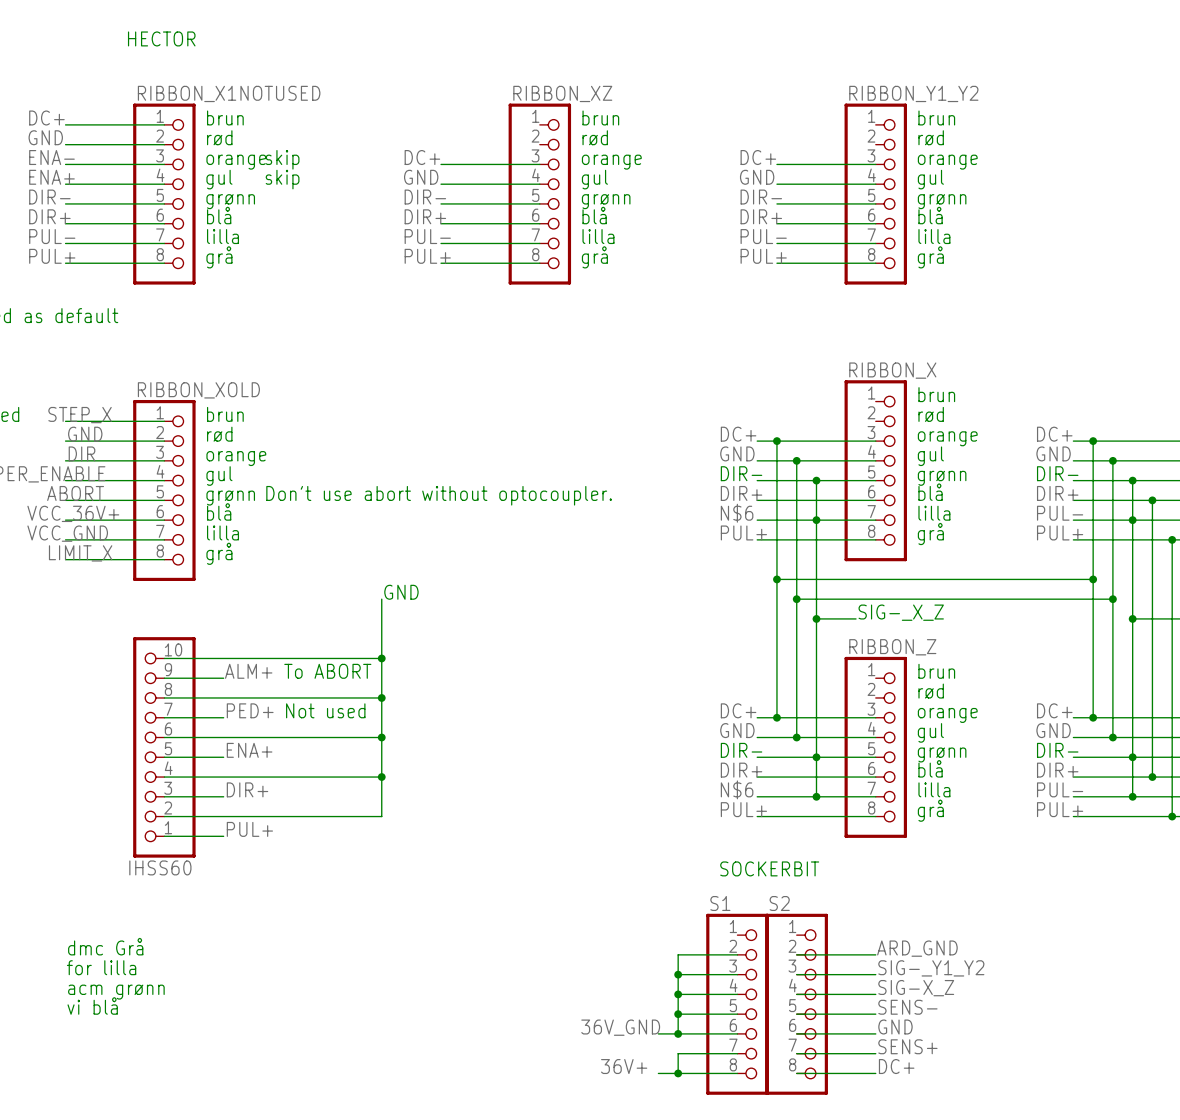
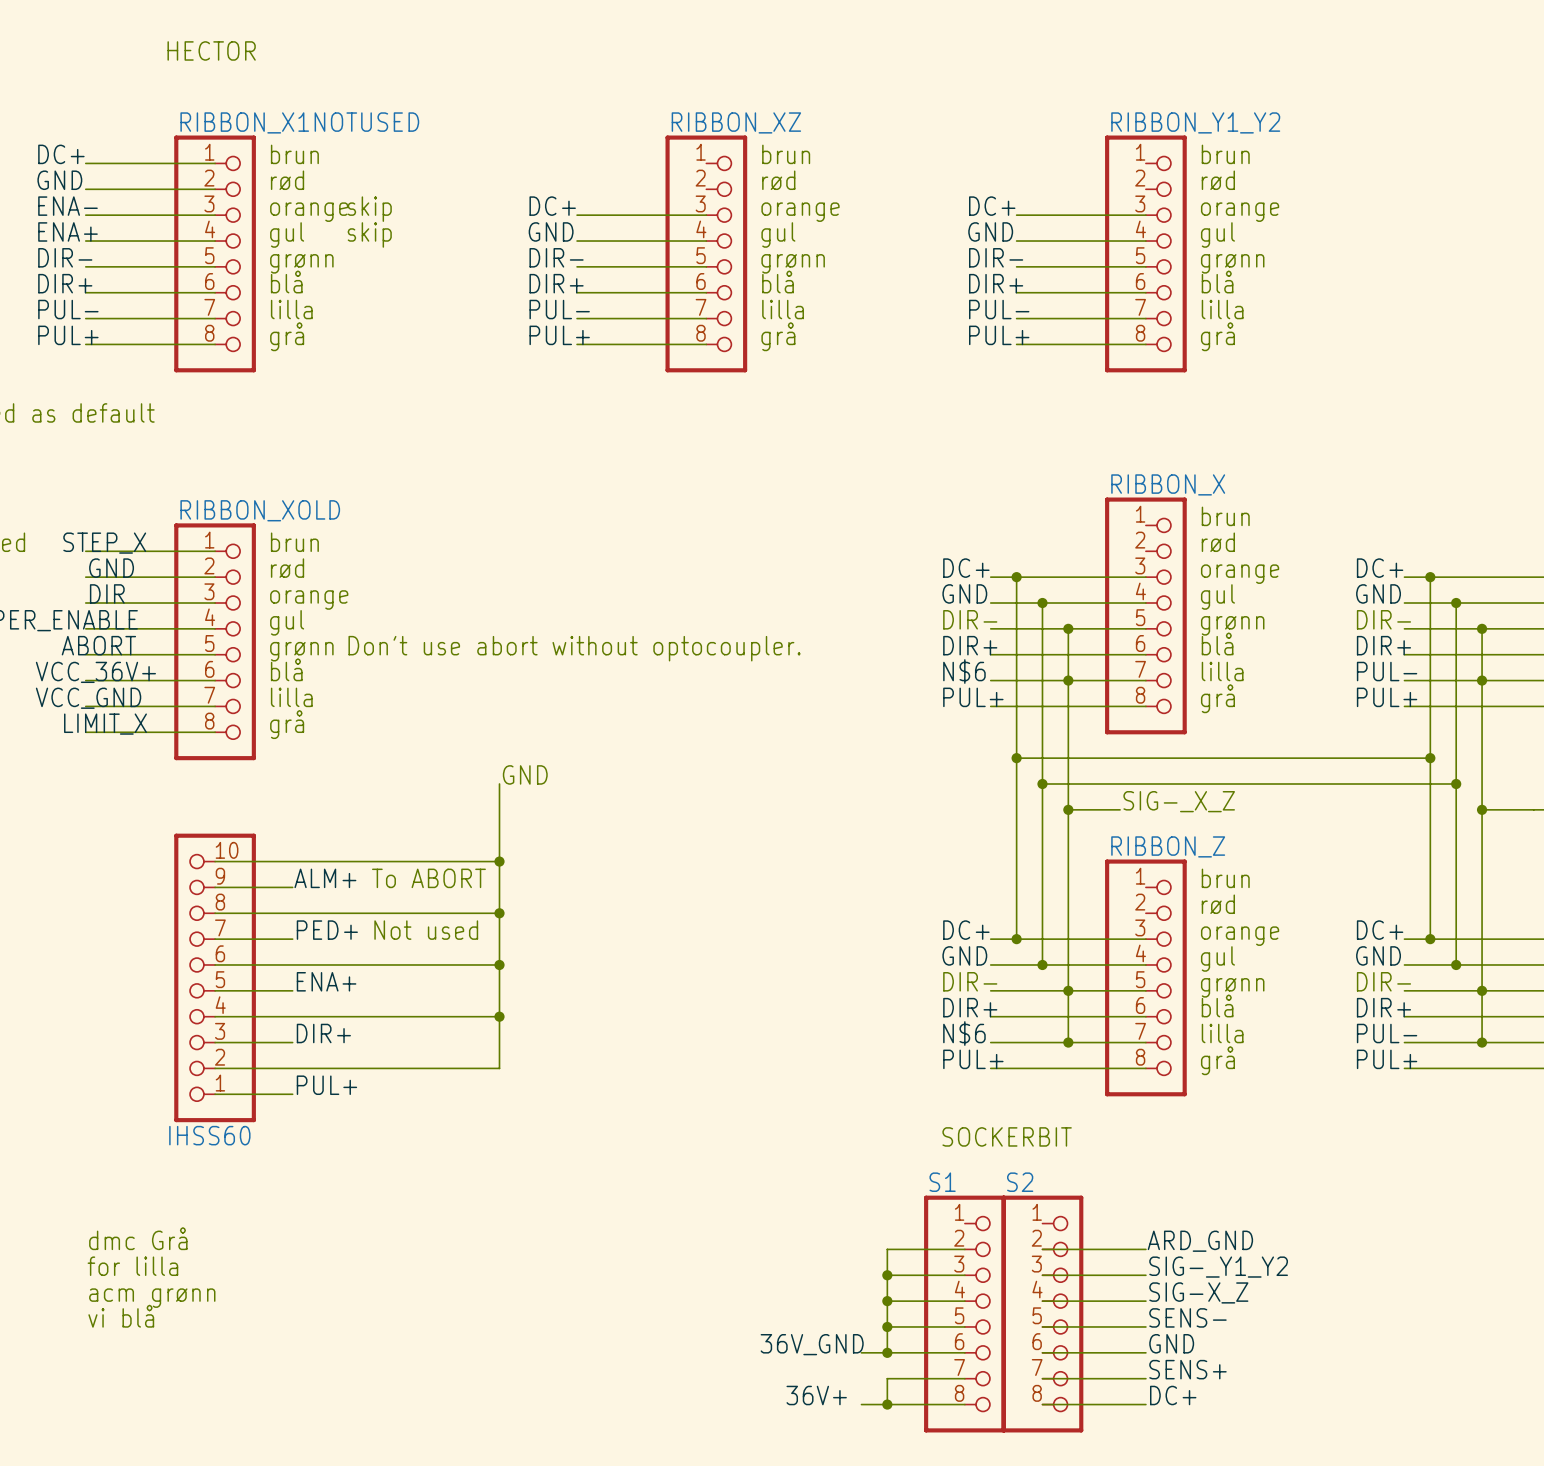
wire: (1152, 500) (1152, 777) -> none
junction: (1152, 500) -> none
wire: (1172, 539) (1172, 816) -> none
junction: (1172, 539) -> none
junction: (1152, 777) -> none
junction: (1172, 816) -> none

